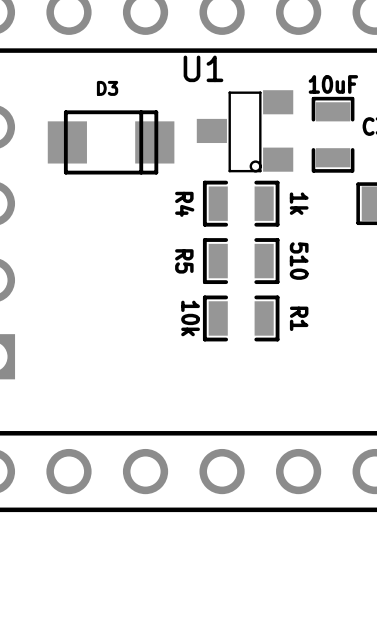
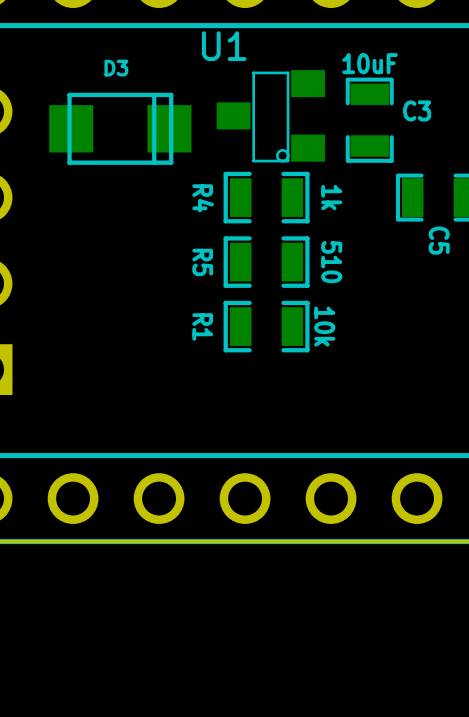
R1 value position: 10k (190, 318) -> 10k (324, 326)
R1 name position: R1 (299, 318) -> R1 (202, 326)

